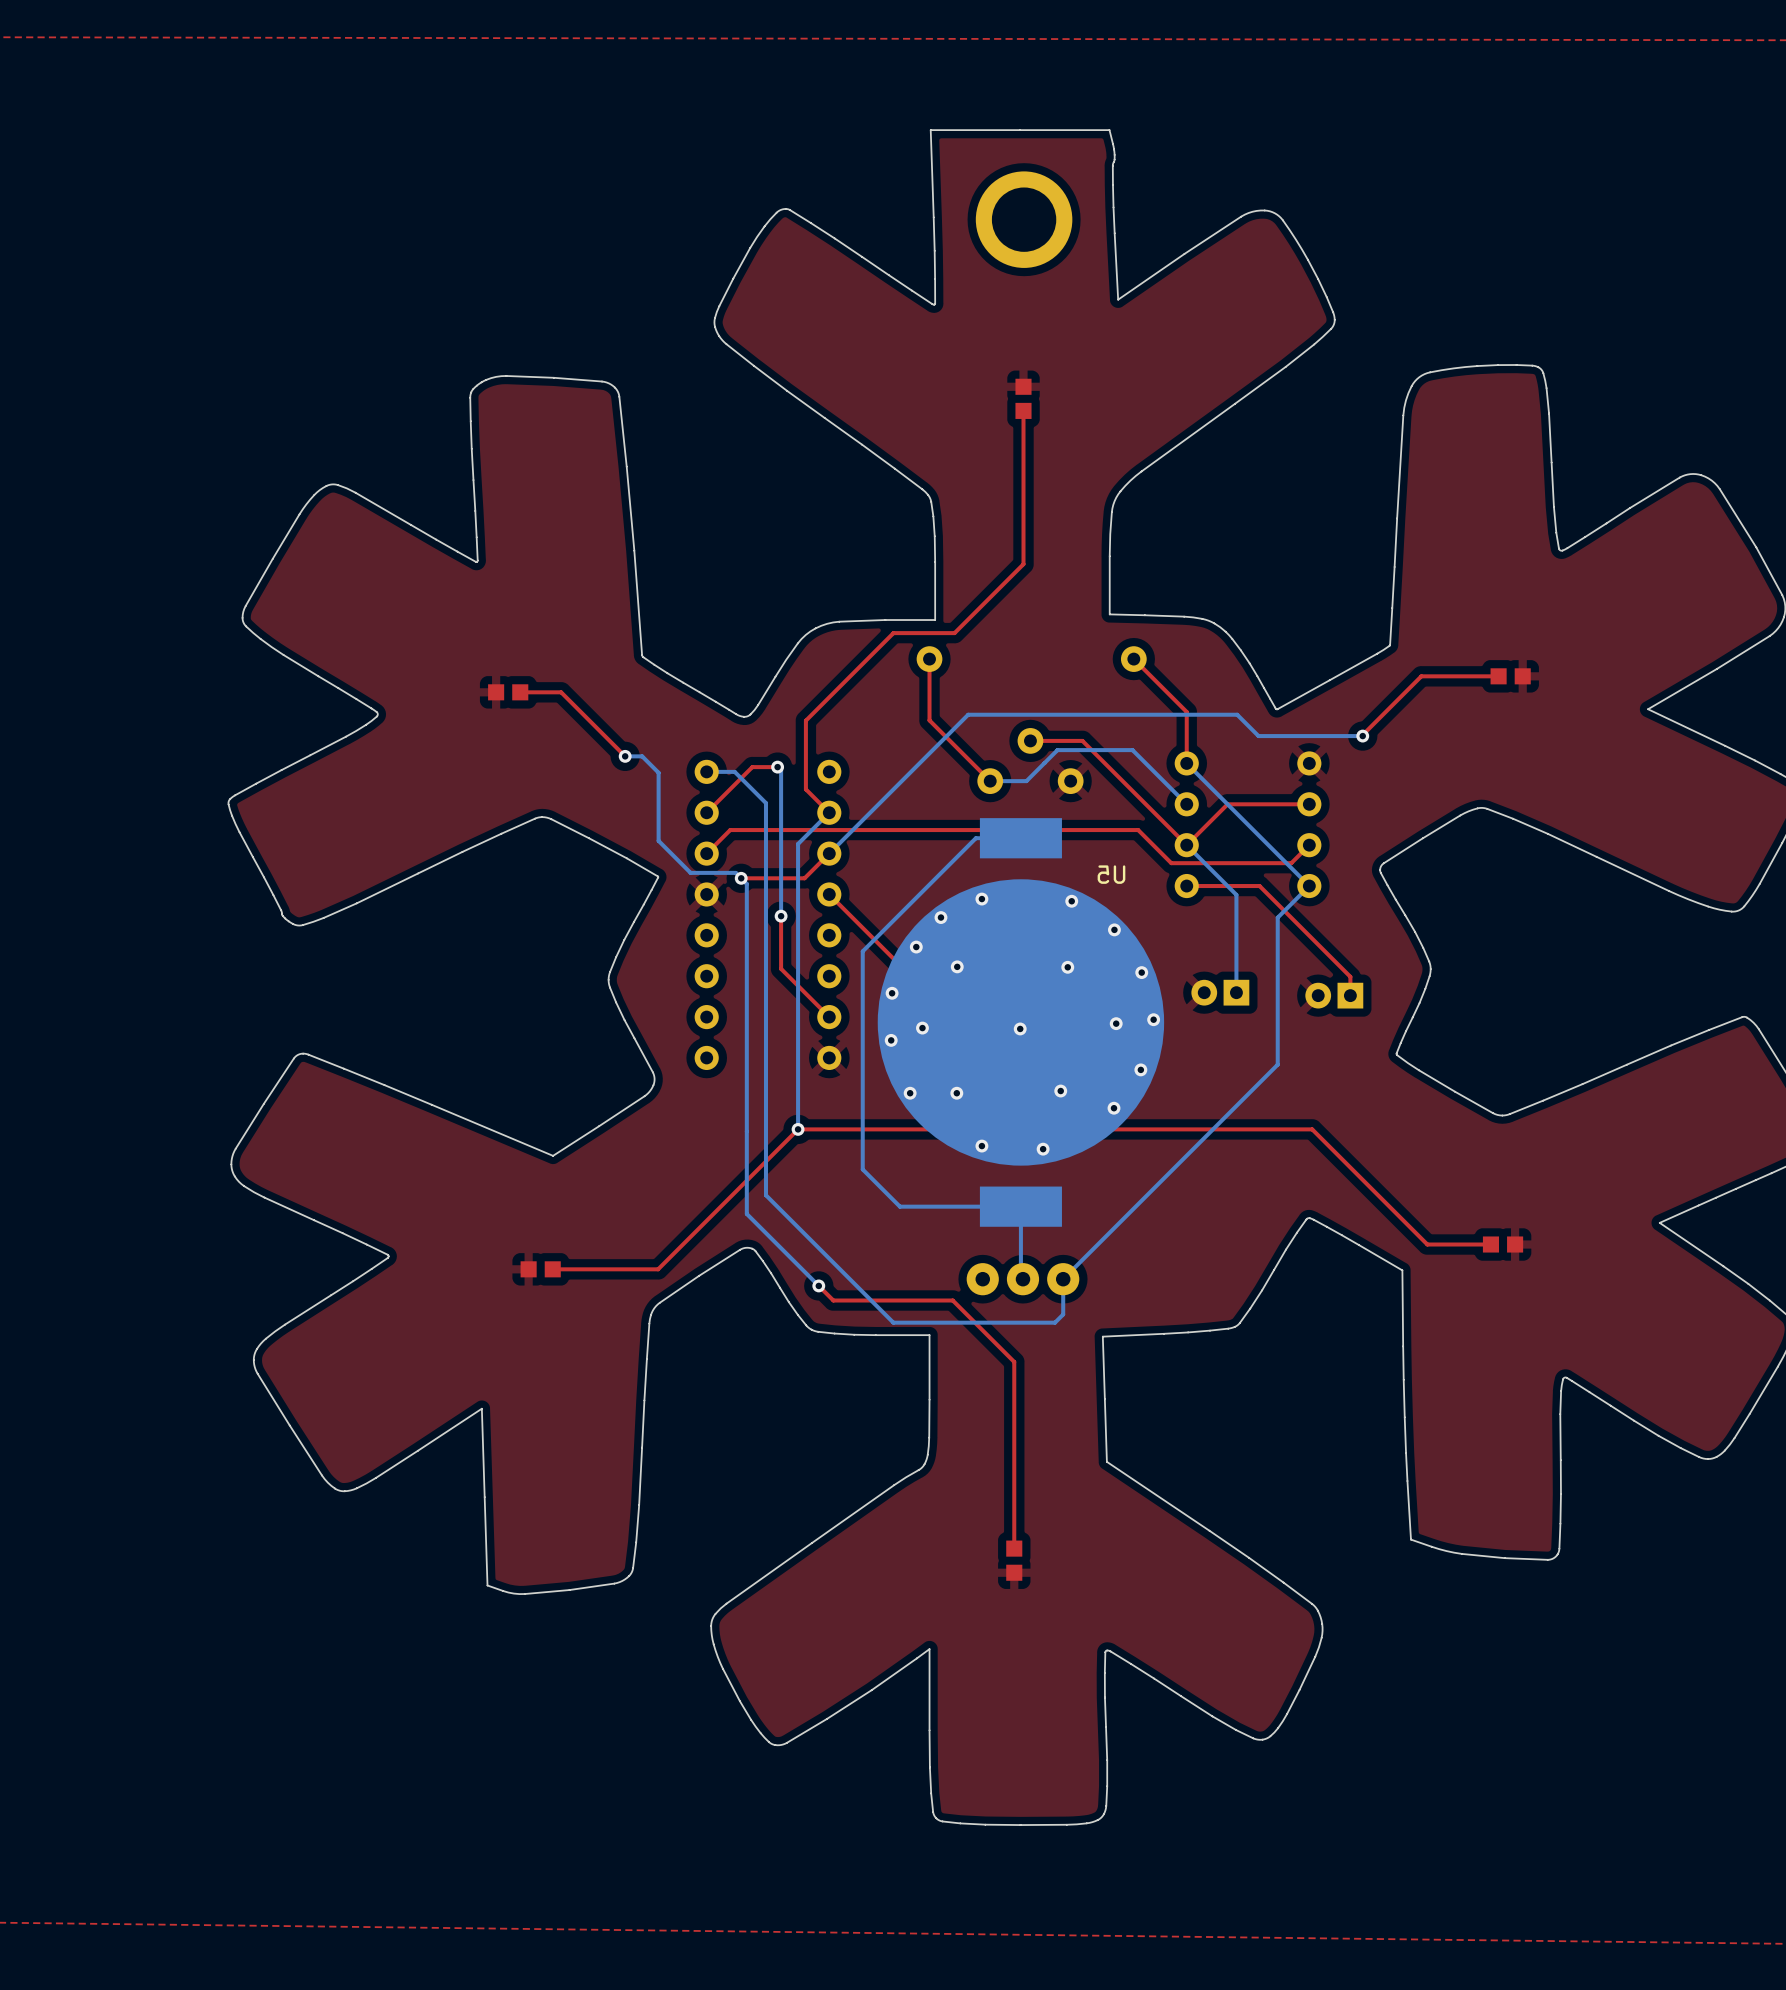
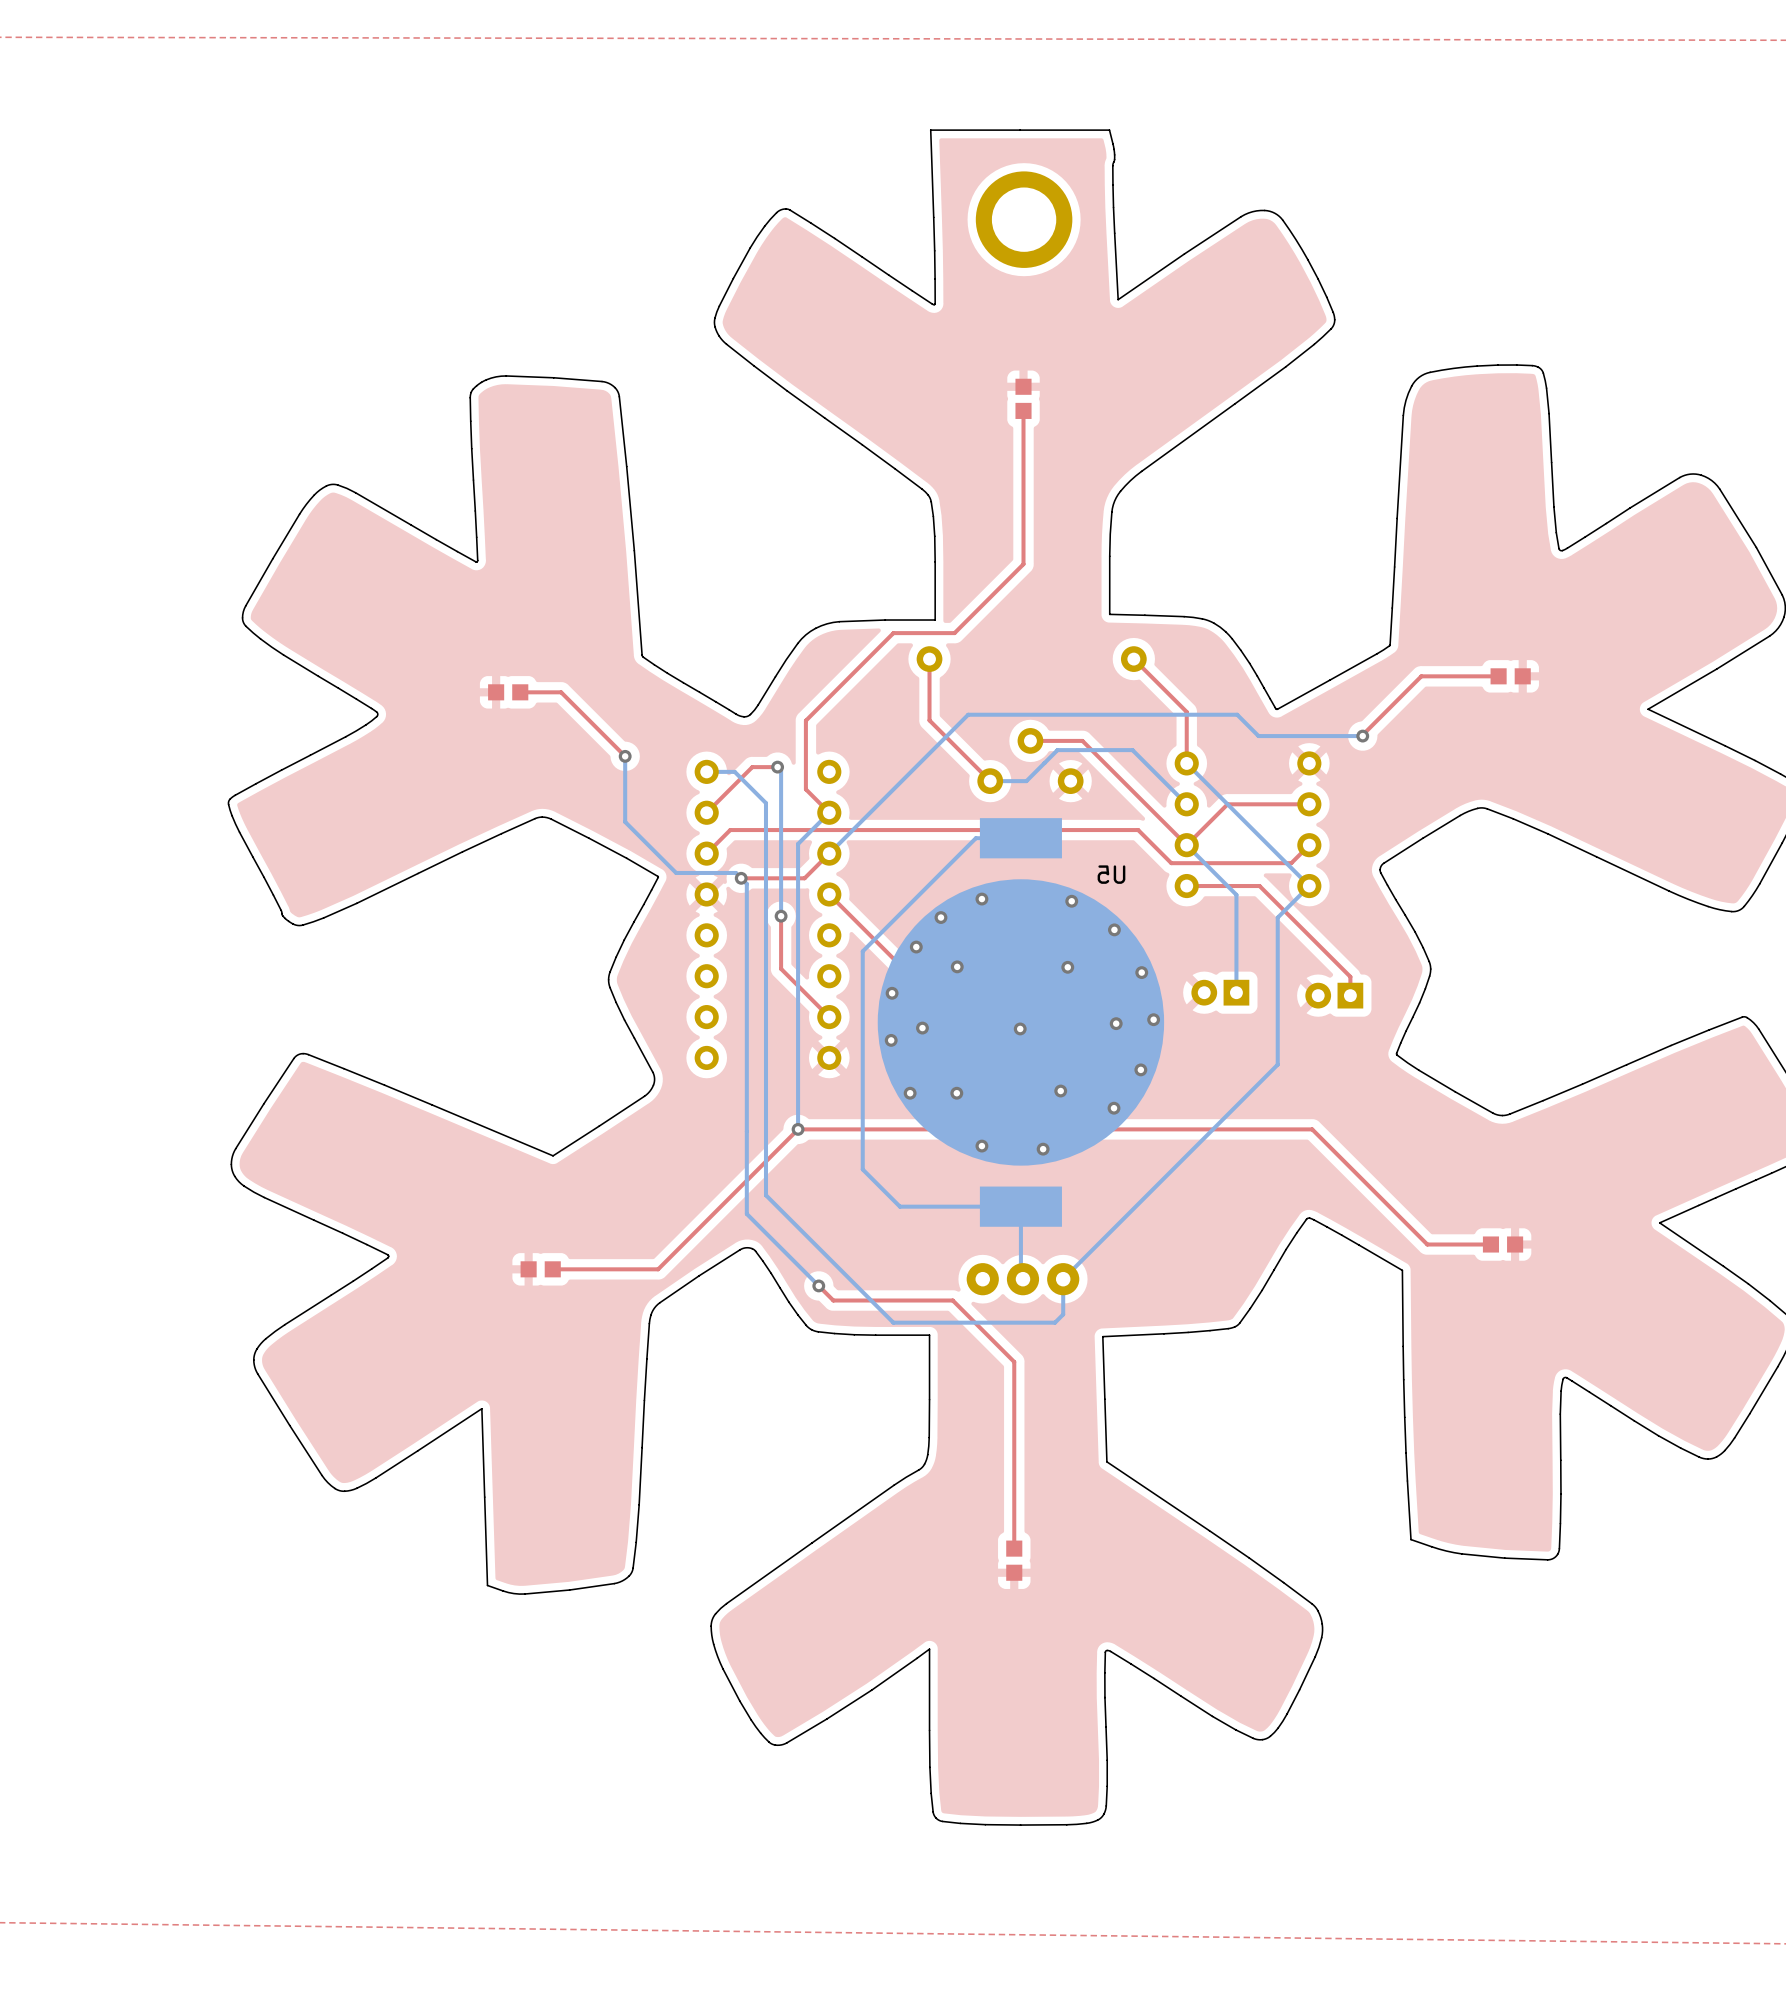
bottom track: (625, 756) (642, 756) (658, 772) (658, 840) (690, 872) -> (625, 756) (625, 821) (676, 872) (690, 872)

